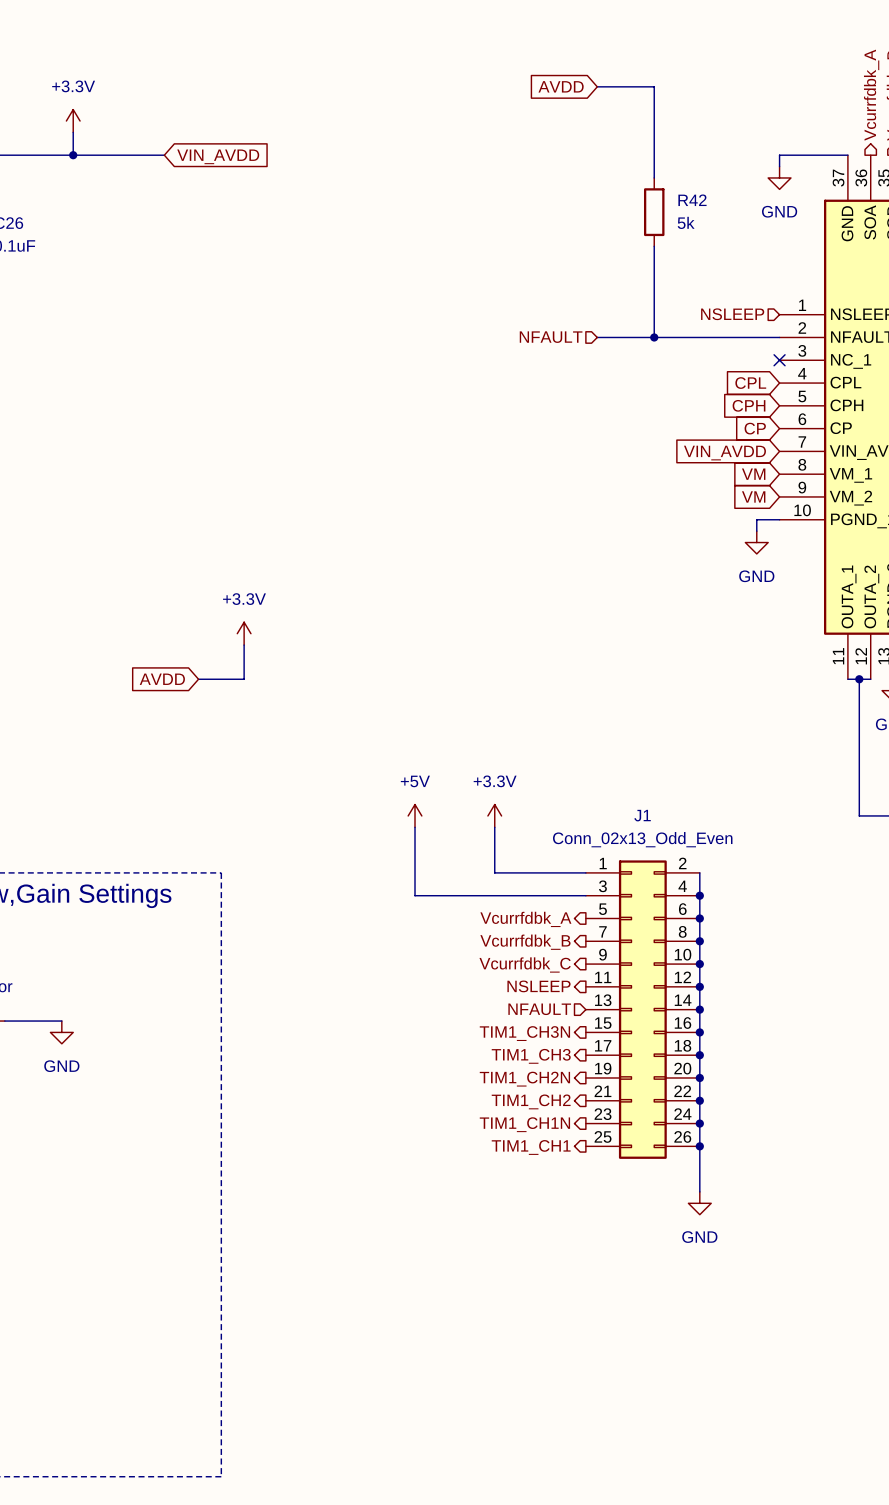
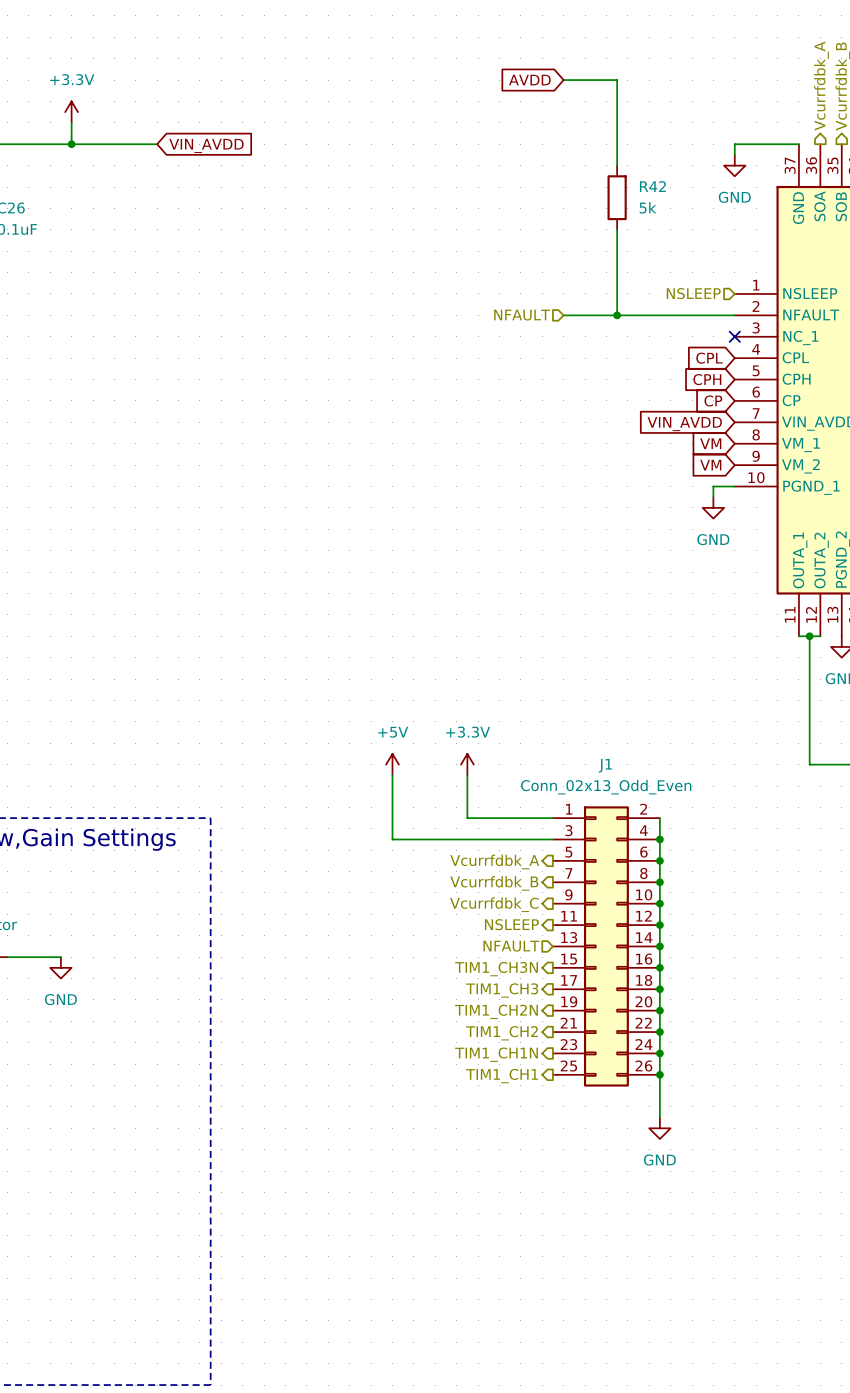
power symbol: +3.3V (244, 633) -> none
wire: (244, 645) (244, 679) (198, 679) -> none
global label: AVDD (162, 679) -> none

